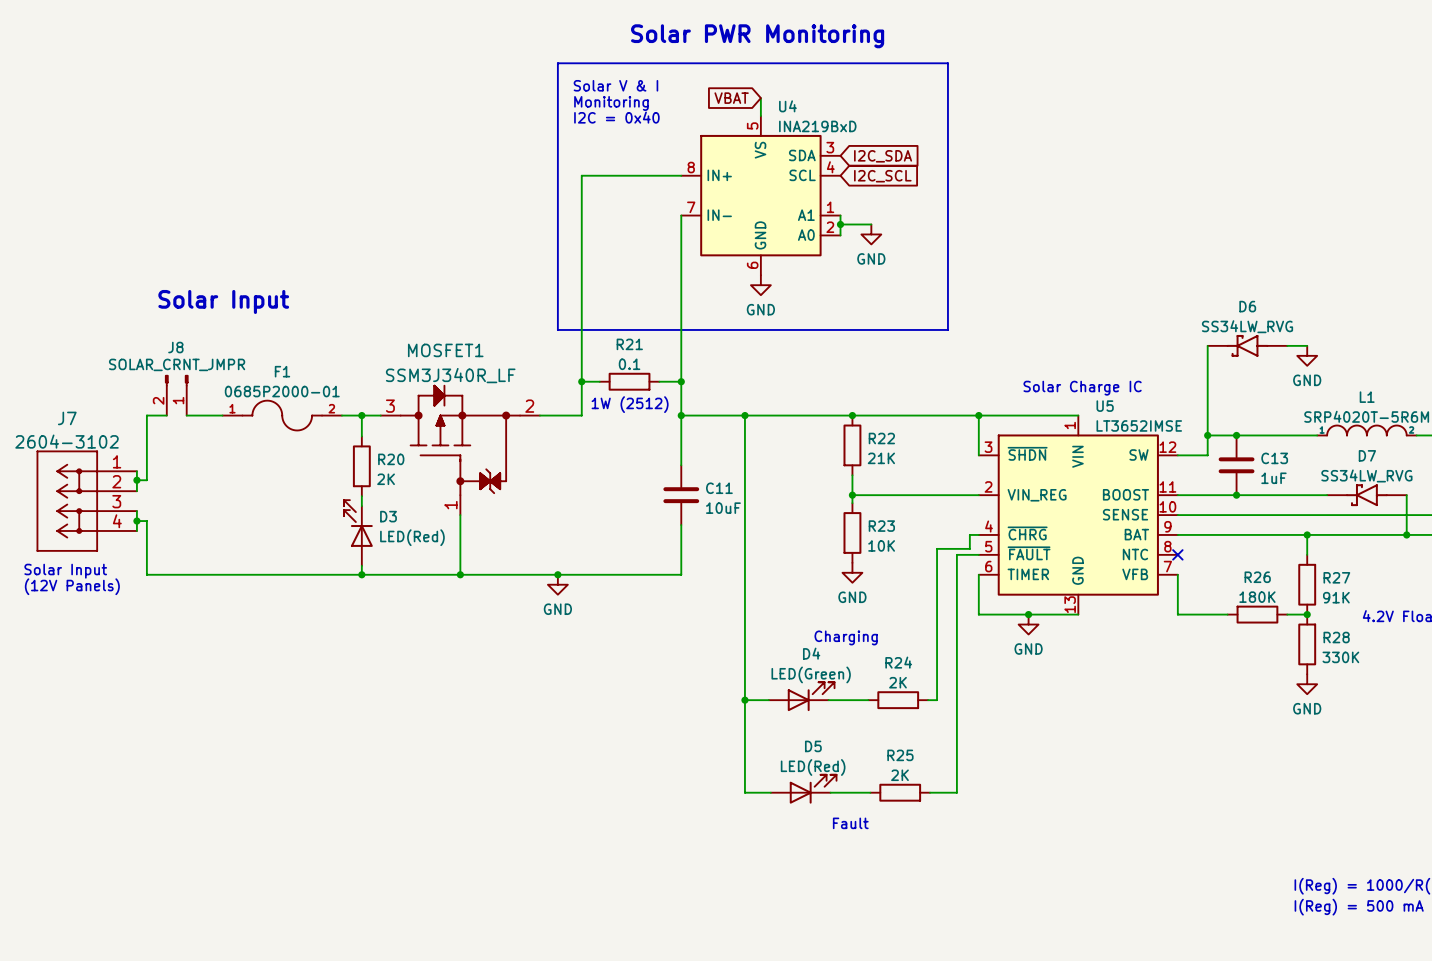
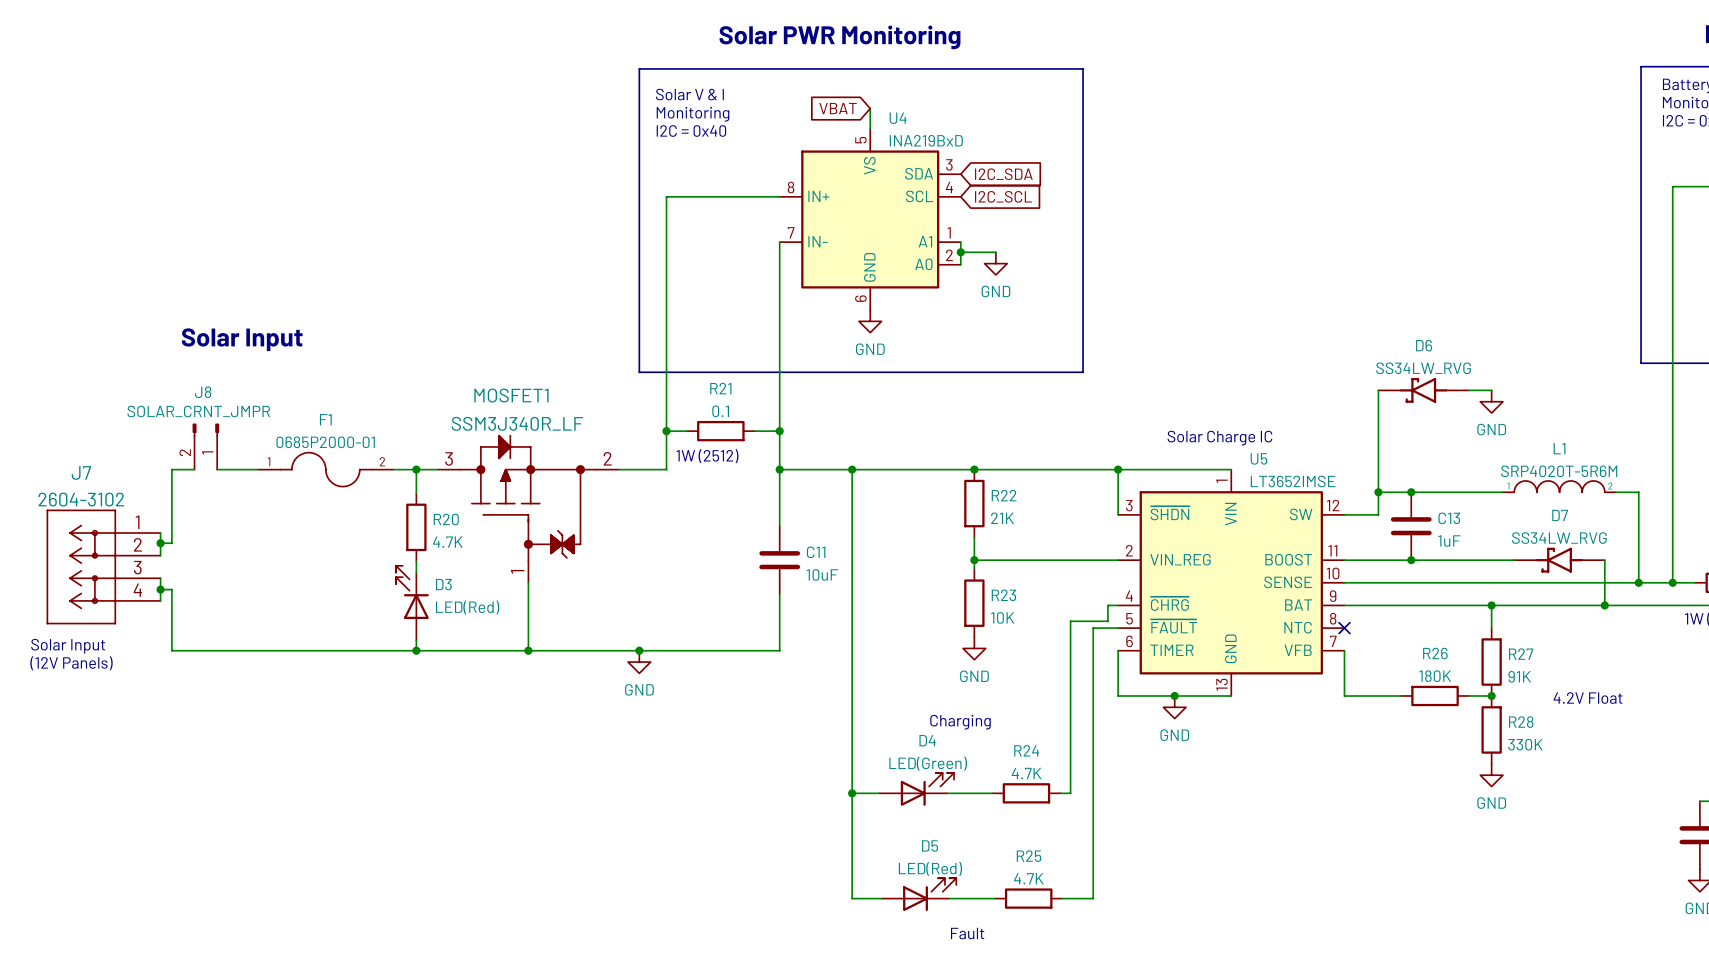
R20 value: 2K (386, 479) -> 4.7K (447, 542)
R24 value: 2K (897, 682) -> 4.7K (1026, 773)
R25 value: 2K (899, 775) -> 4.7K (1028, 878)

